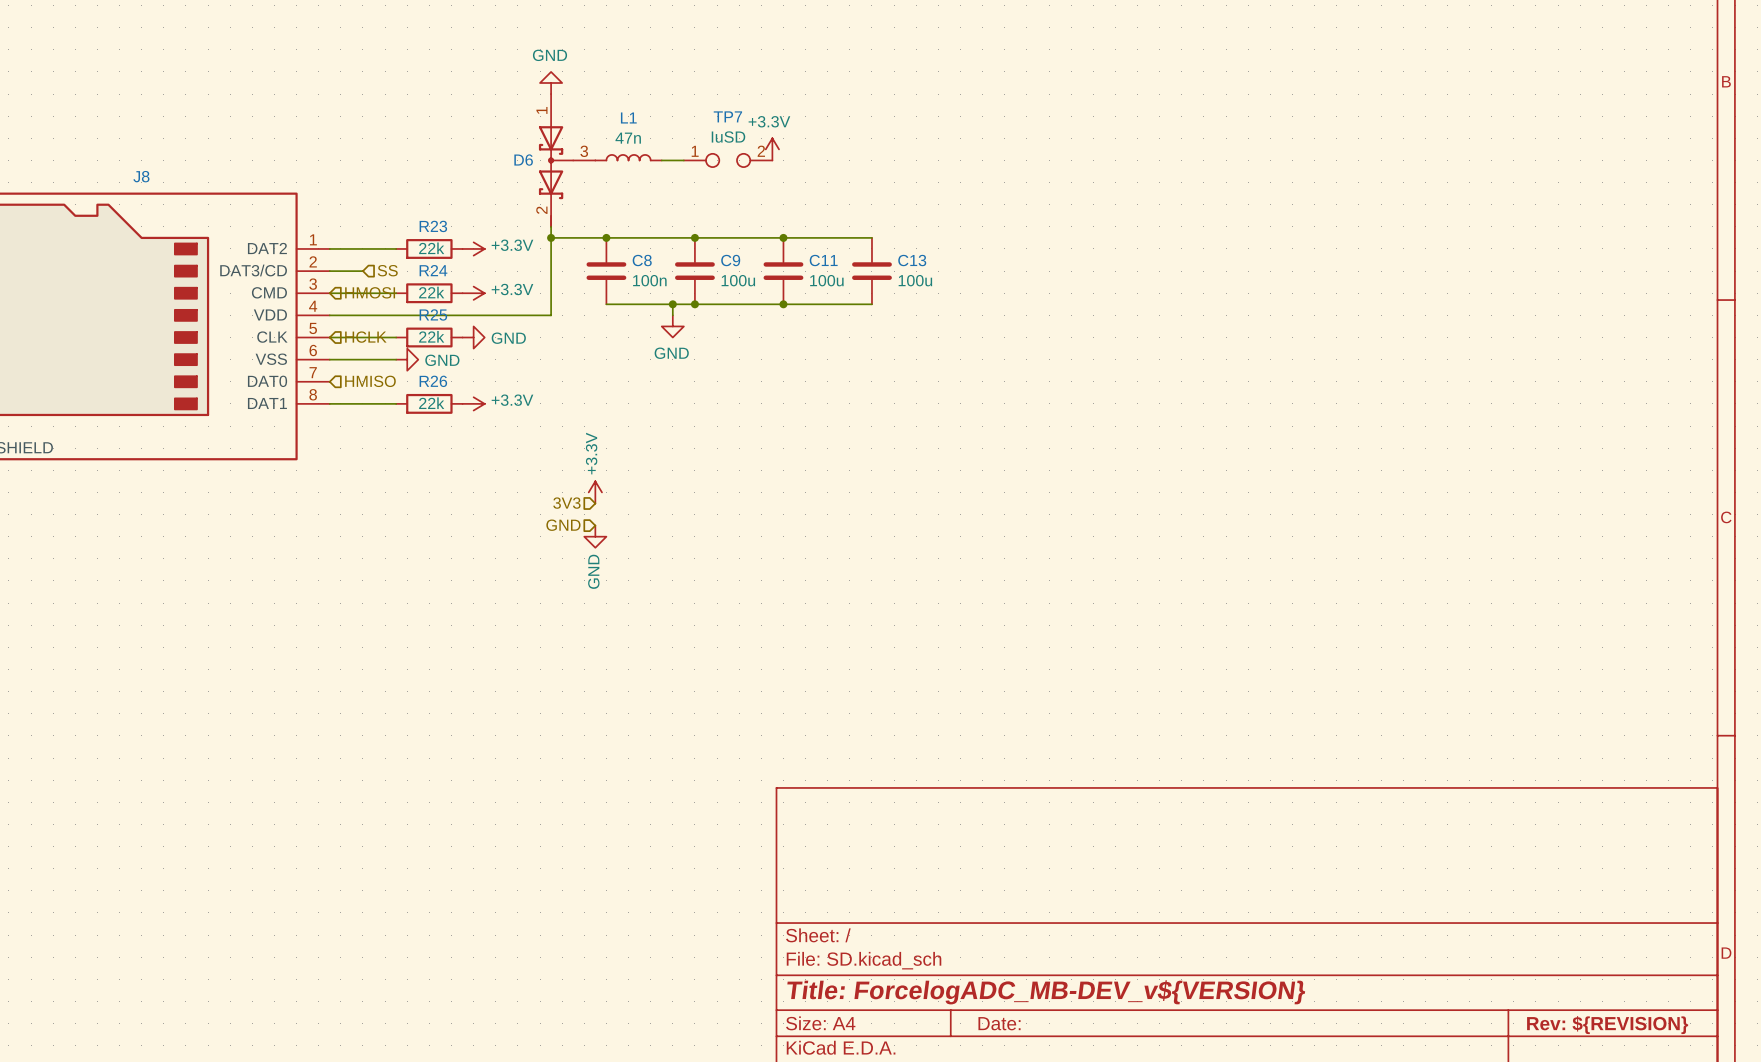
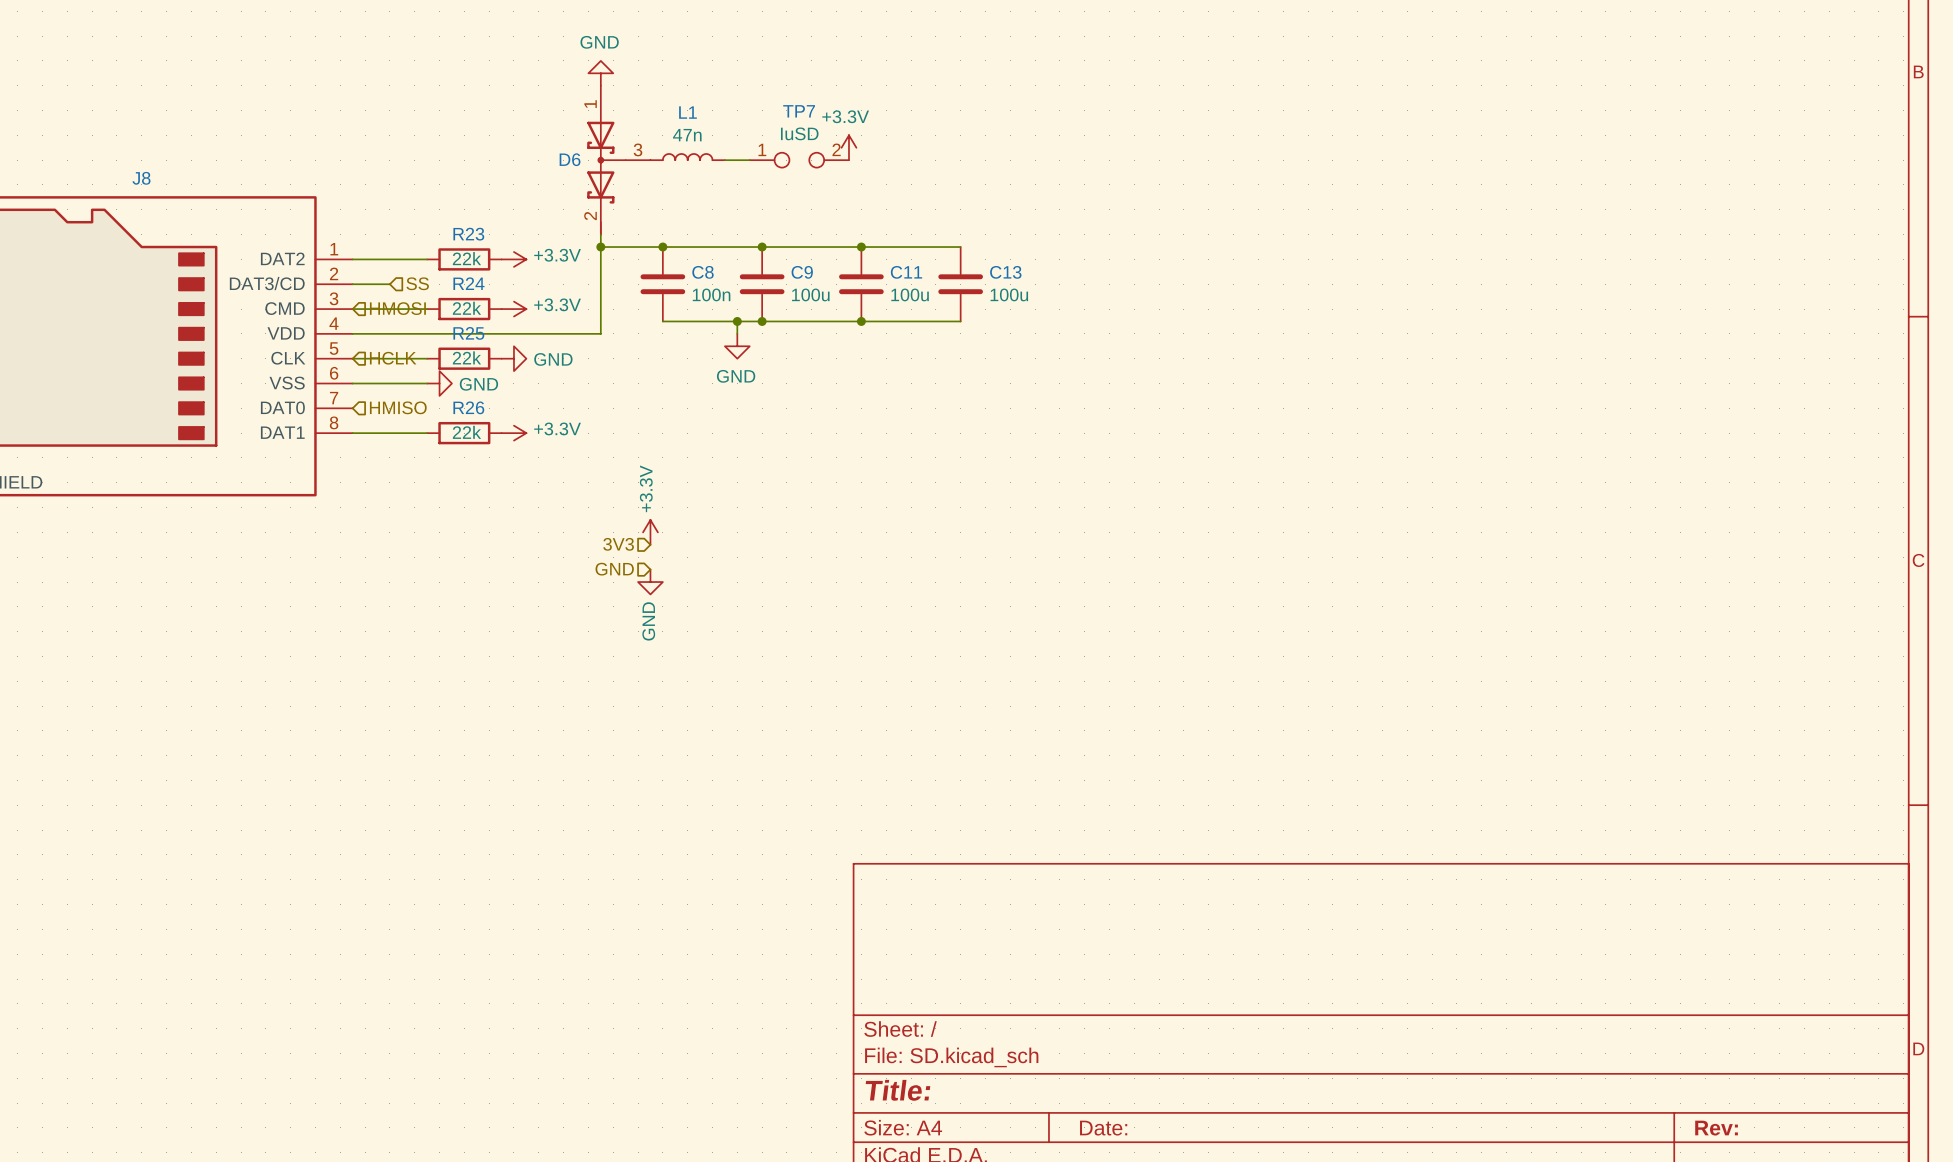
title block: Title: ForcelogADC_MB-DEV_v${VERSION} (1046, 992) -> Title: (897, 1090)
title block: Rev: ${REVISION} (1607, 1025) -> Rev: (1716, 1128)

